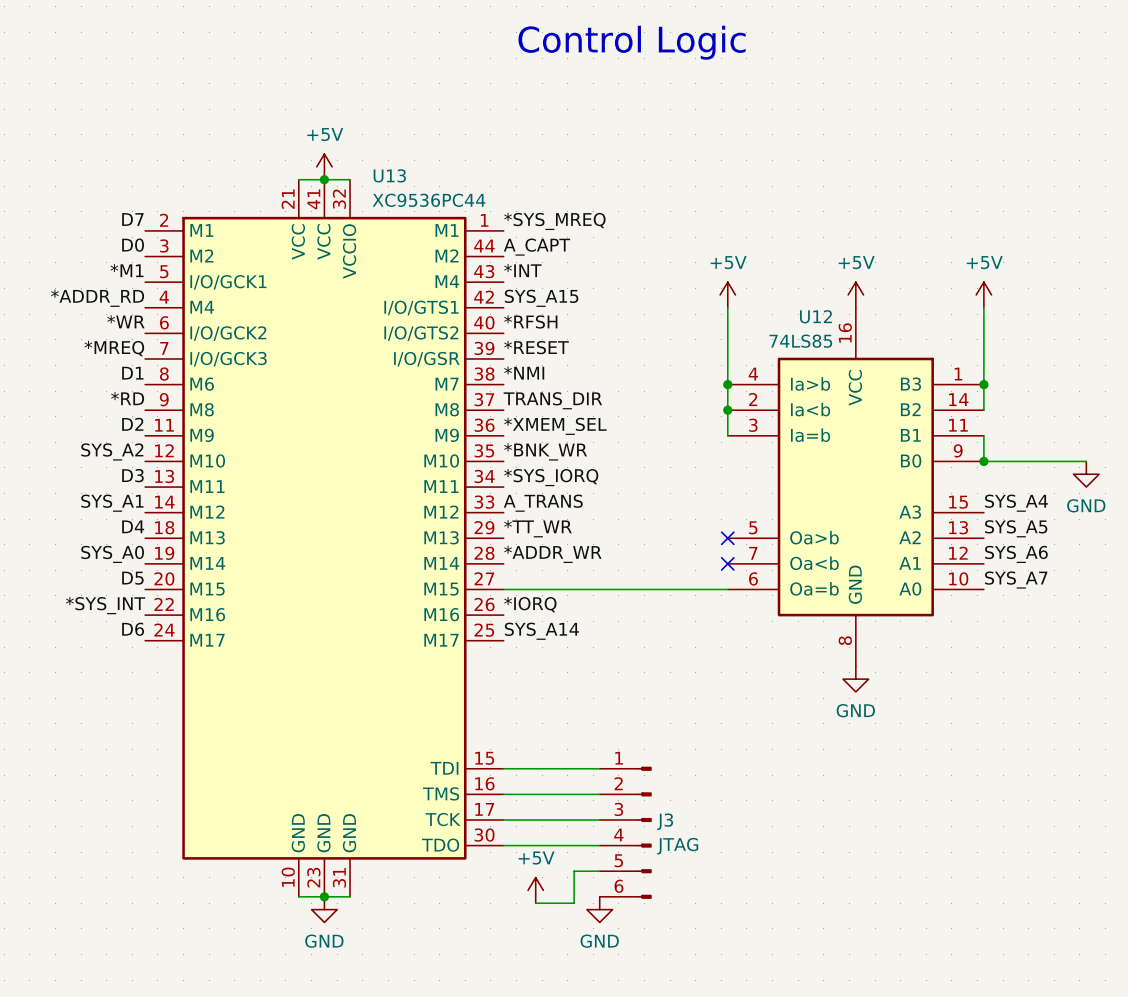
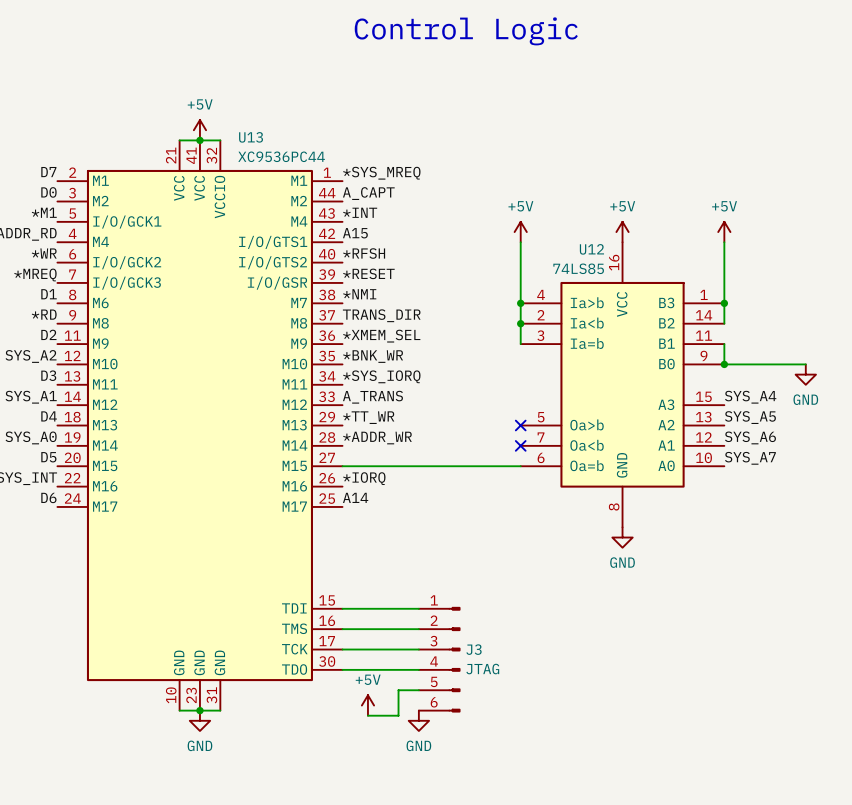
label: SYS_A15 (541, 298) -> A15 (355, 233)
label: SYS_A14 (541, 631) -> A14 (355, 497)

